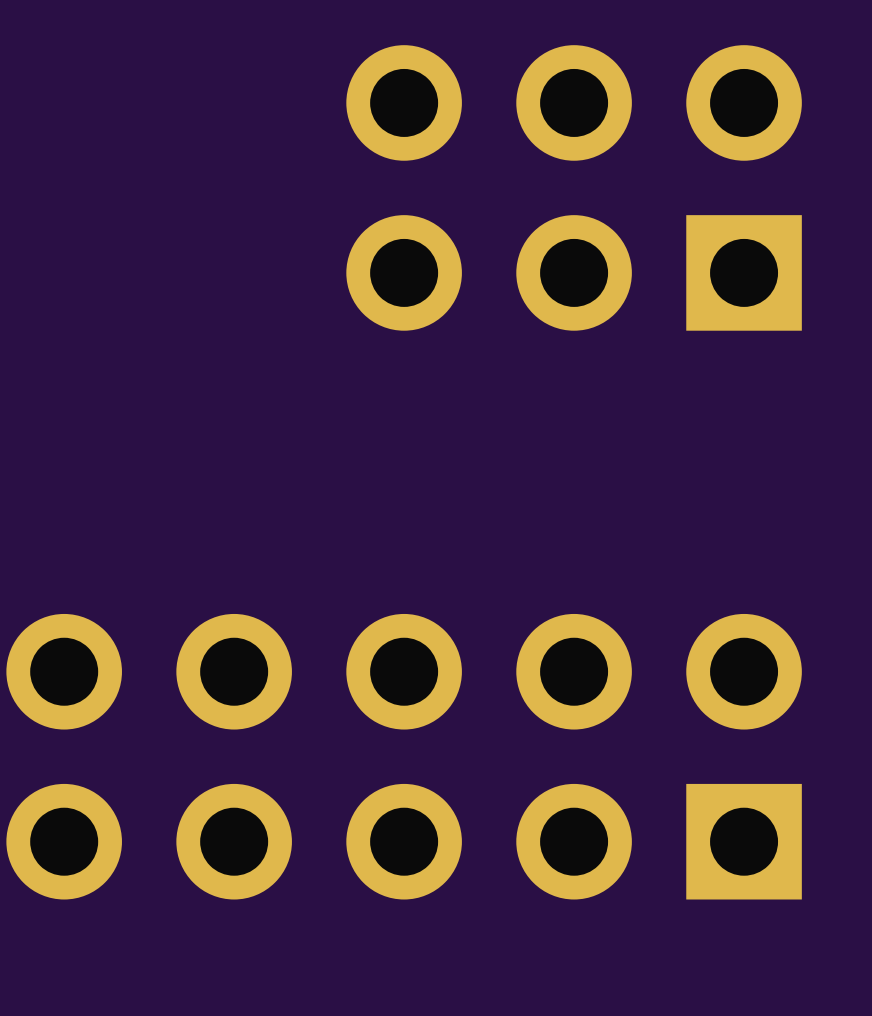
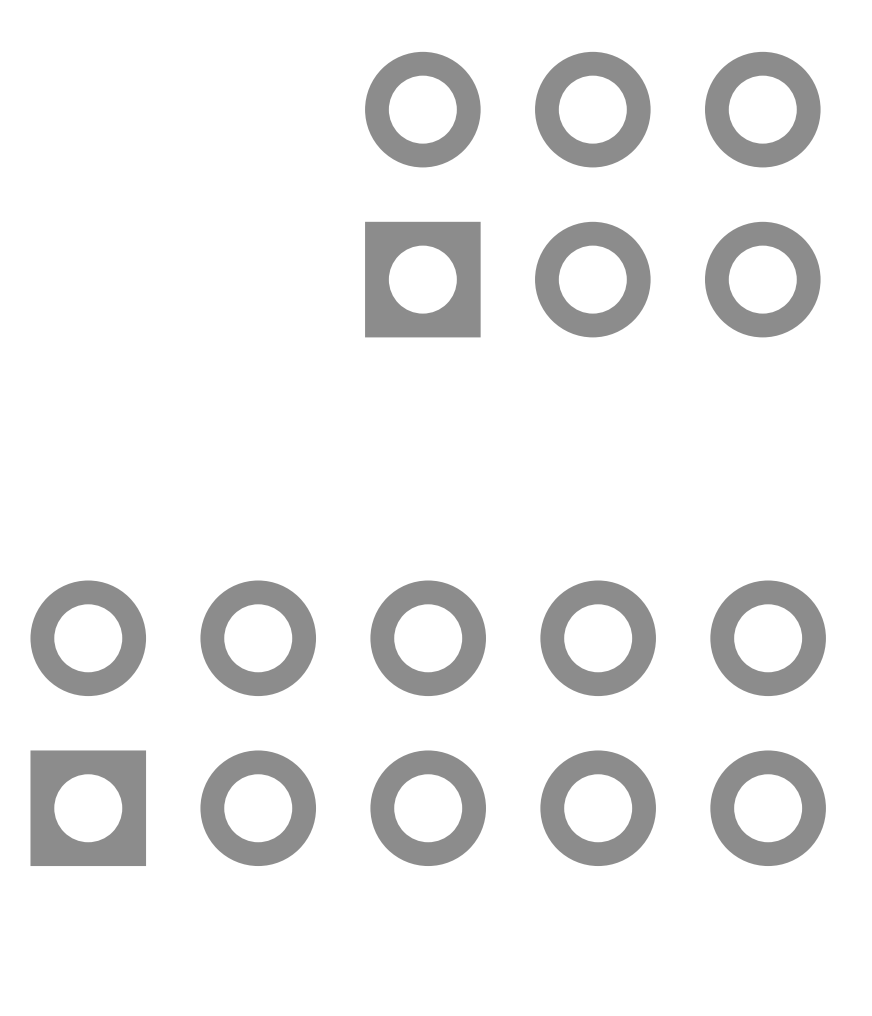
part footprint: [346, 45, 802, 331] -> [365, 51, 821, 338]
part footprint: [6, 613, 802, 900] -> [30, 580, 826, 867]

